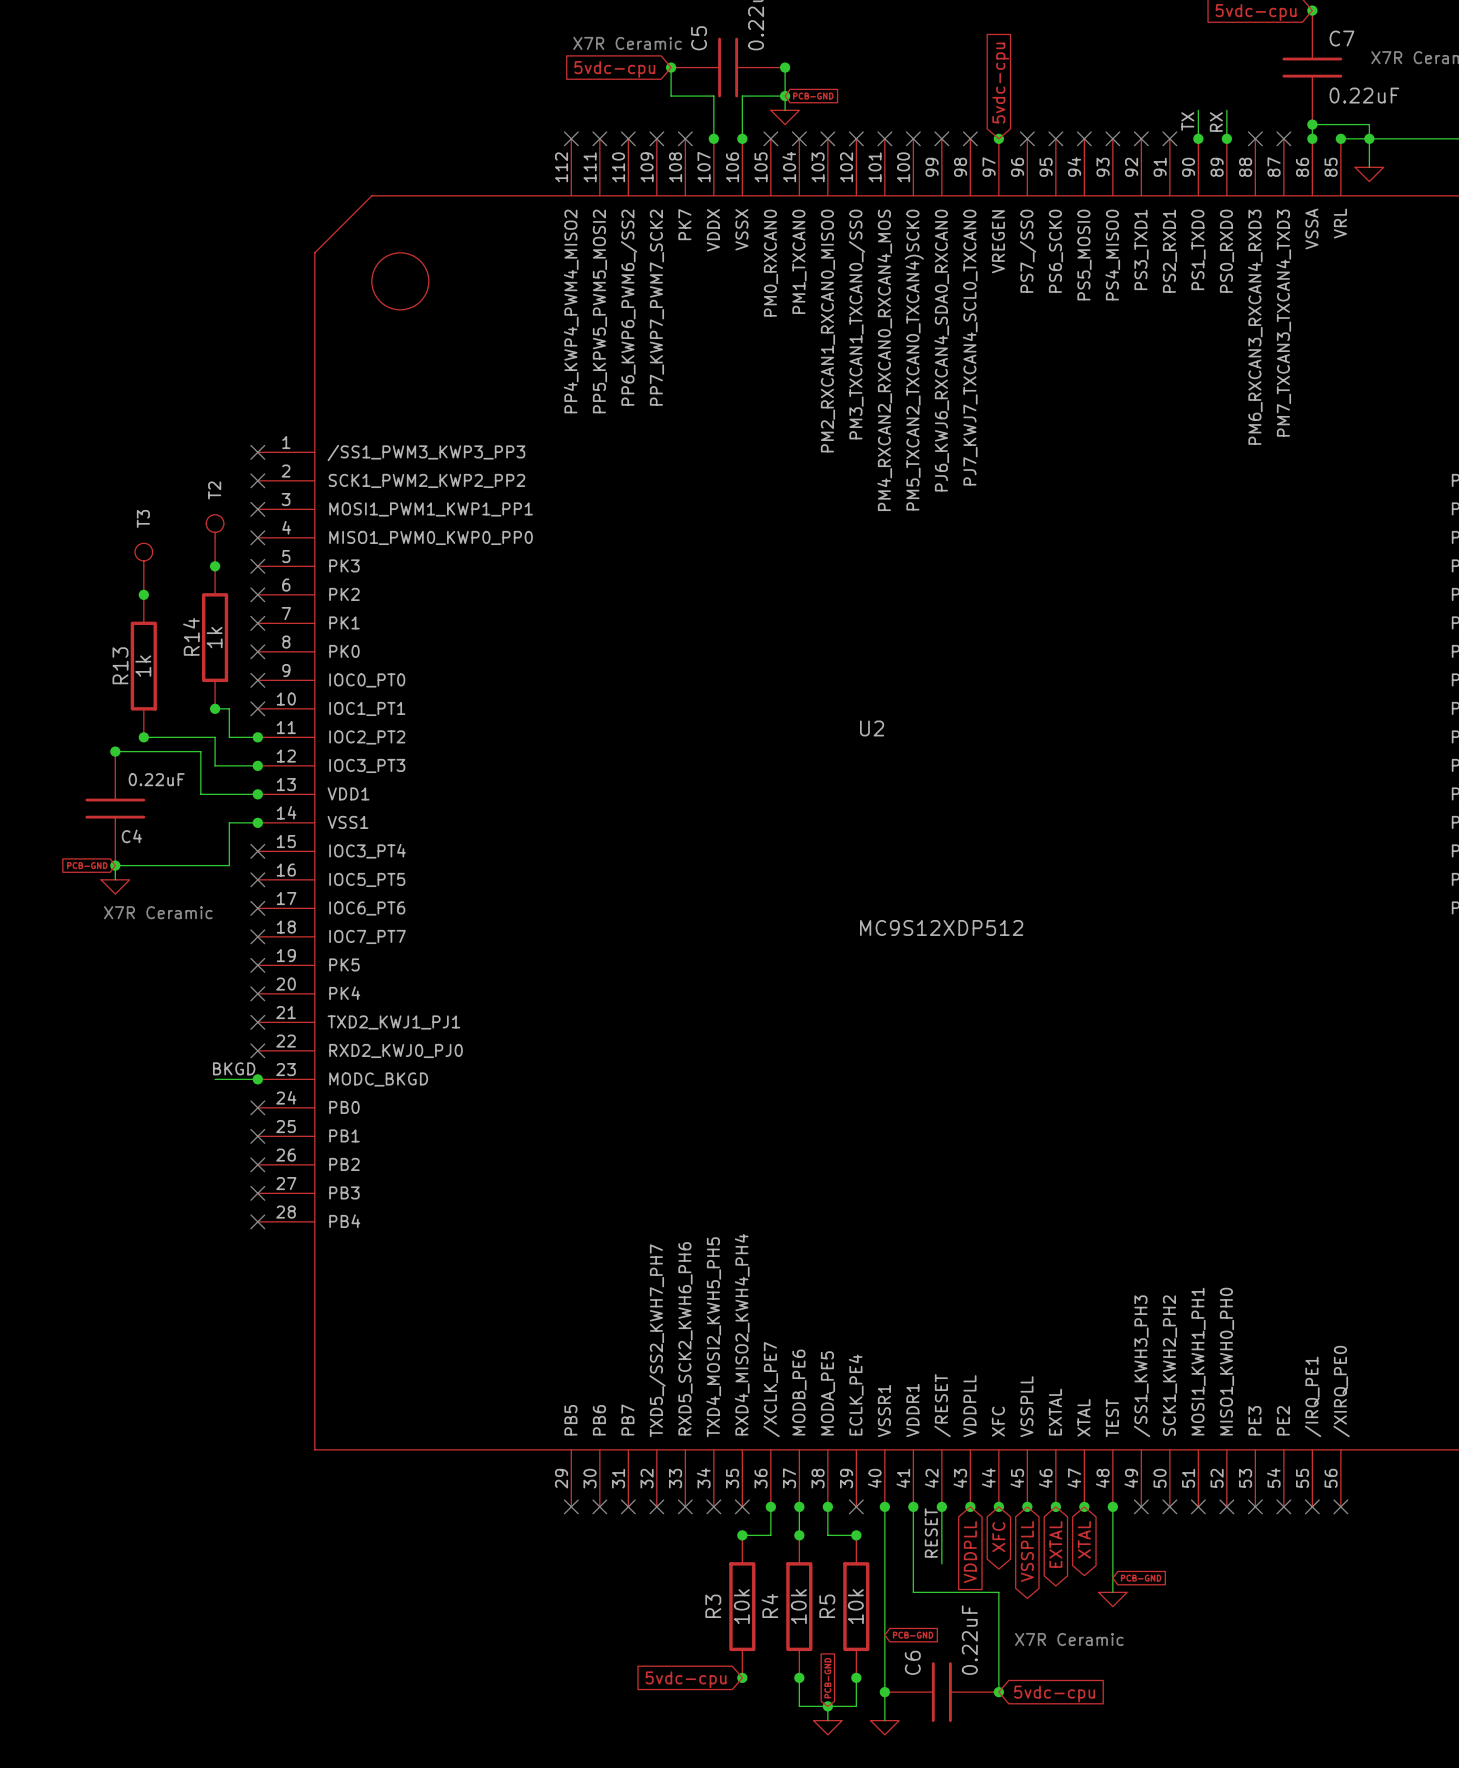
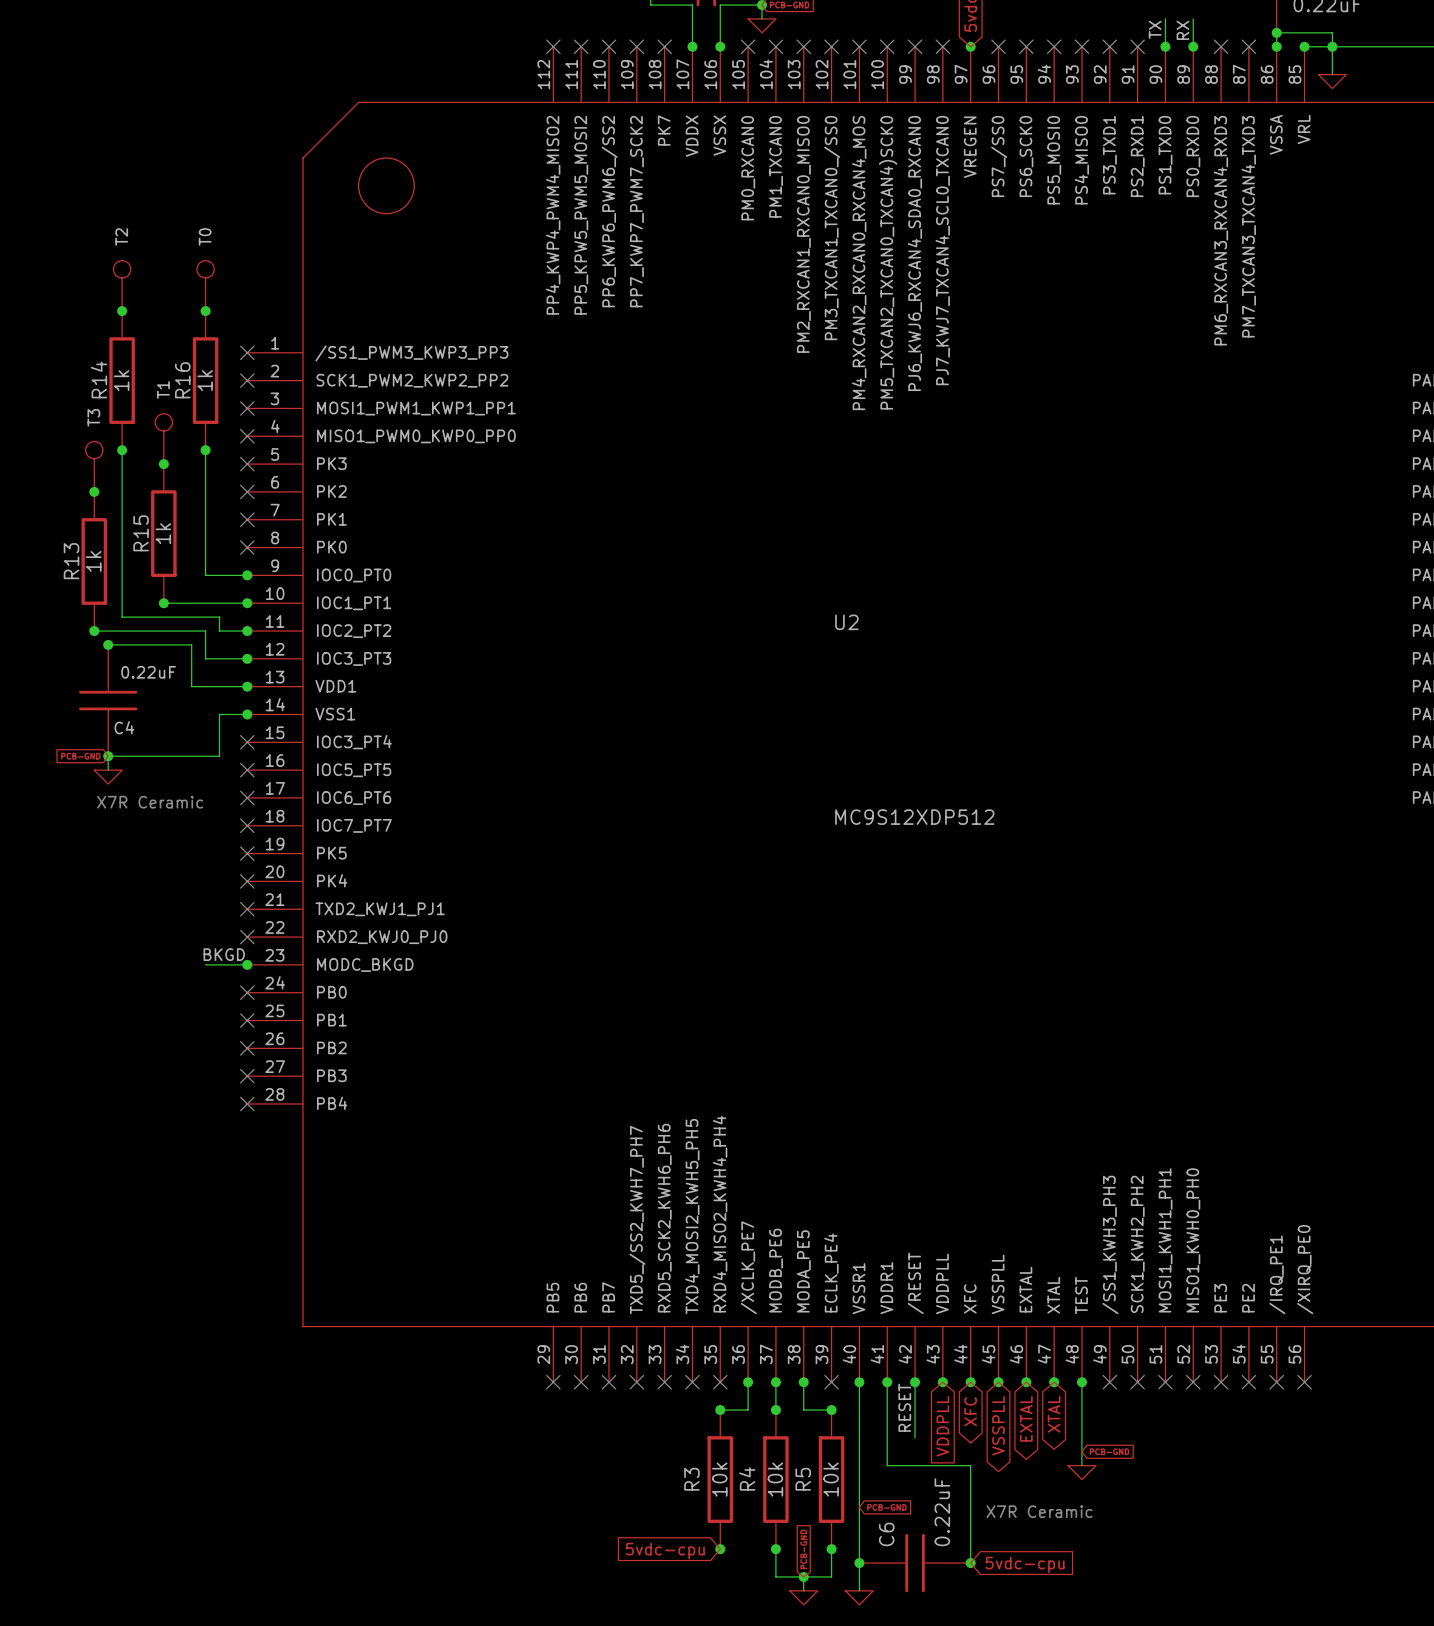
T0: none -> (205, 285)
junction: none -> (122, 311)
junction: none -> (205, 311)
R16: none -> 1k (205, 380)
T1: none -> (163, 438)
T2 position: (215, 540) -> (122, 285)
wire: none -> (122, 450) (122, 617) (219, 617)
junction: none -> (122, 450)
wire: none -> (205, 450) (205, 575) (247, 575)
junction: none -> (163, 464)
junction position: (215, 566) -> (205, 450)
T3 position: (143, 569) -> (94, 466)
junction: none -> (94, 491)
junction: (143, 594) -> none
R15: none -> 1k (163, 533)
R14 position: (215, 637) -> (122, 380)
R13 position: (143, 666) -> (94, 561)
junction: none -> (247, 575)
no-connect mark: (257, 680) -> none
wire: none -> (163, 603) (205, 603)
junction: none -> (163, 603)
junction: (215, 708) -> none
wire: (229, 708) (229, 723) -> (219, 603) (247, 603)
junction: none -> (247, 603)
no-connect mark: (257, 708) -> none
wire: none -> (94, 631) (136, 631)
junction: none -> (94, 631)
junction: (143, 737) -> none

